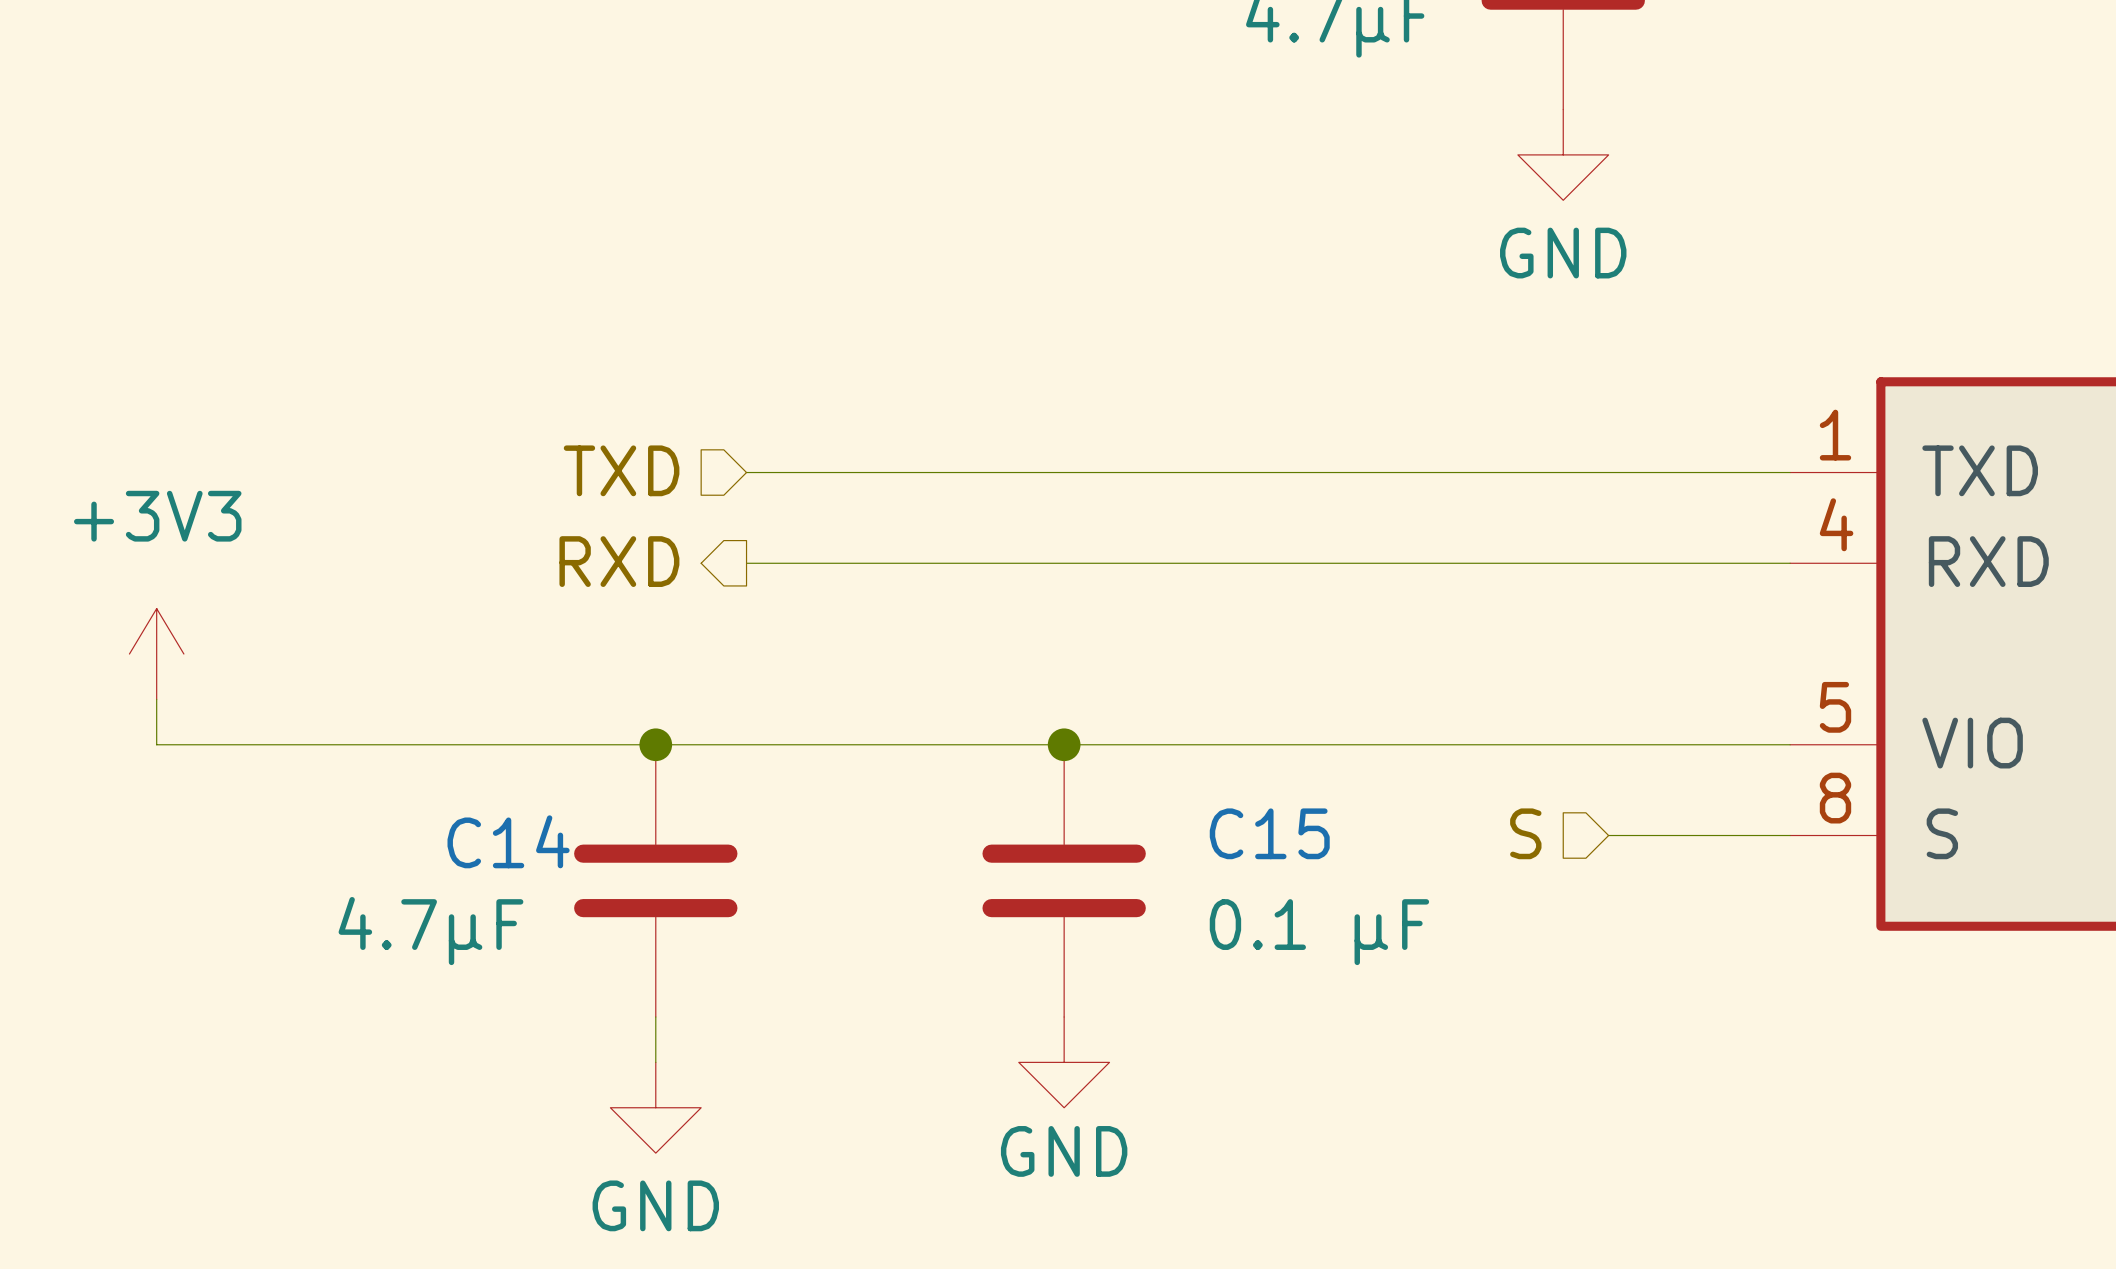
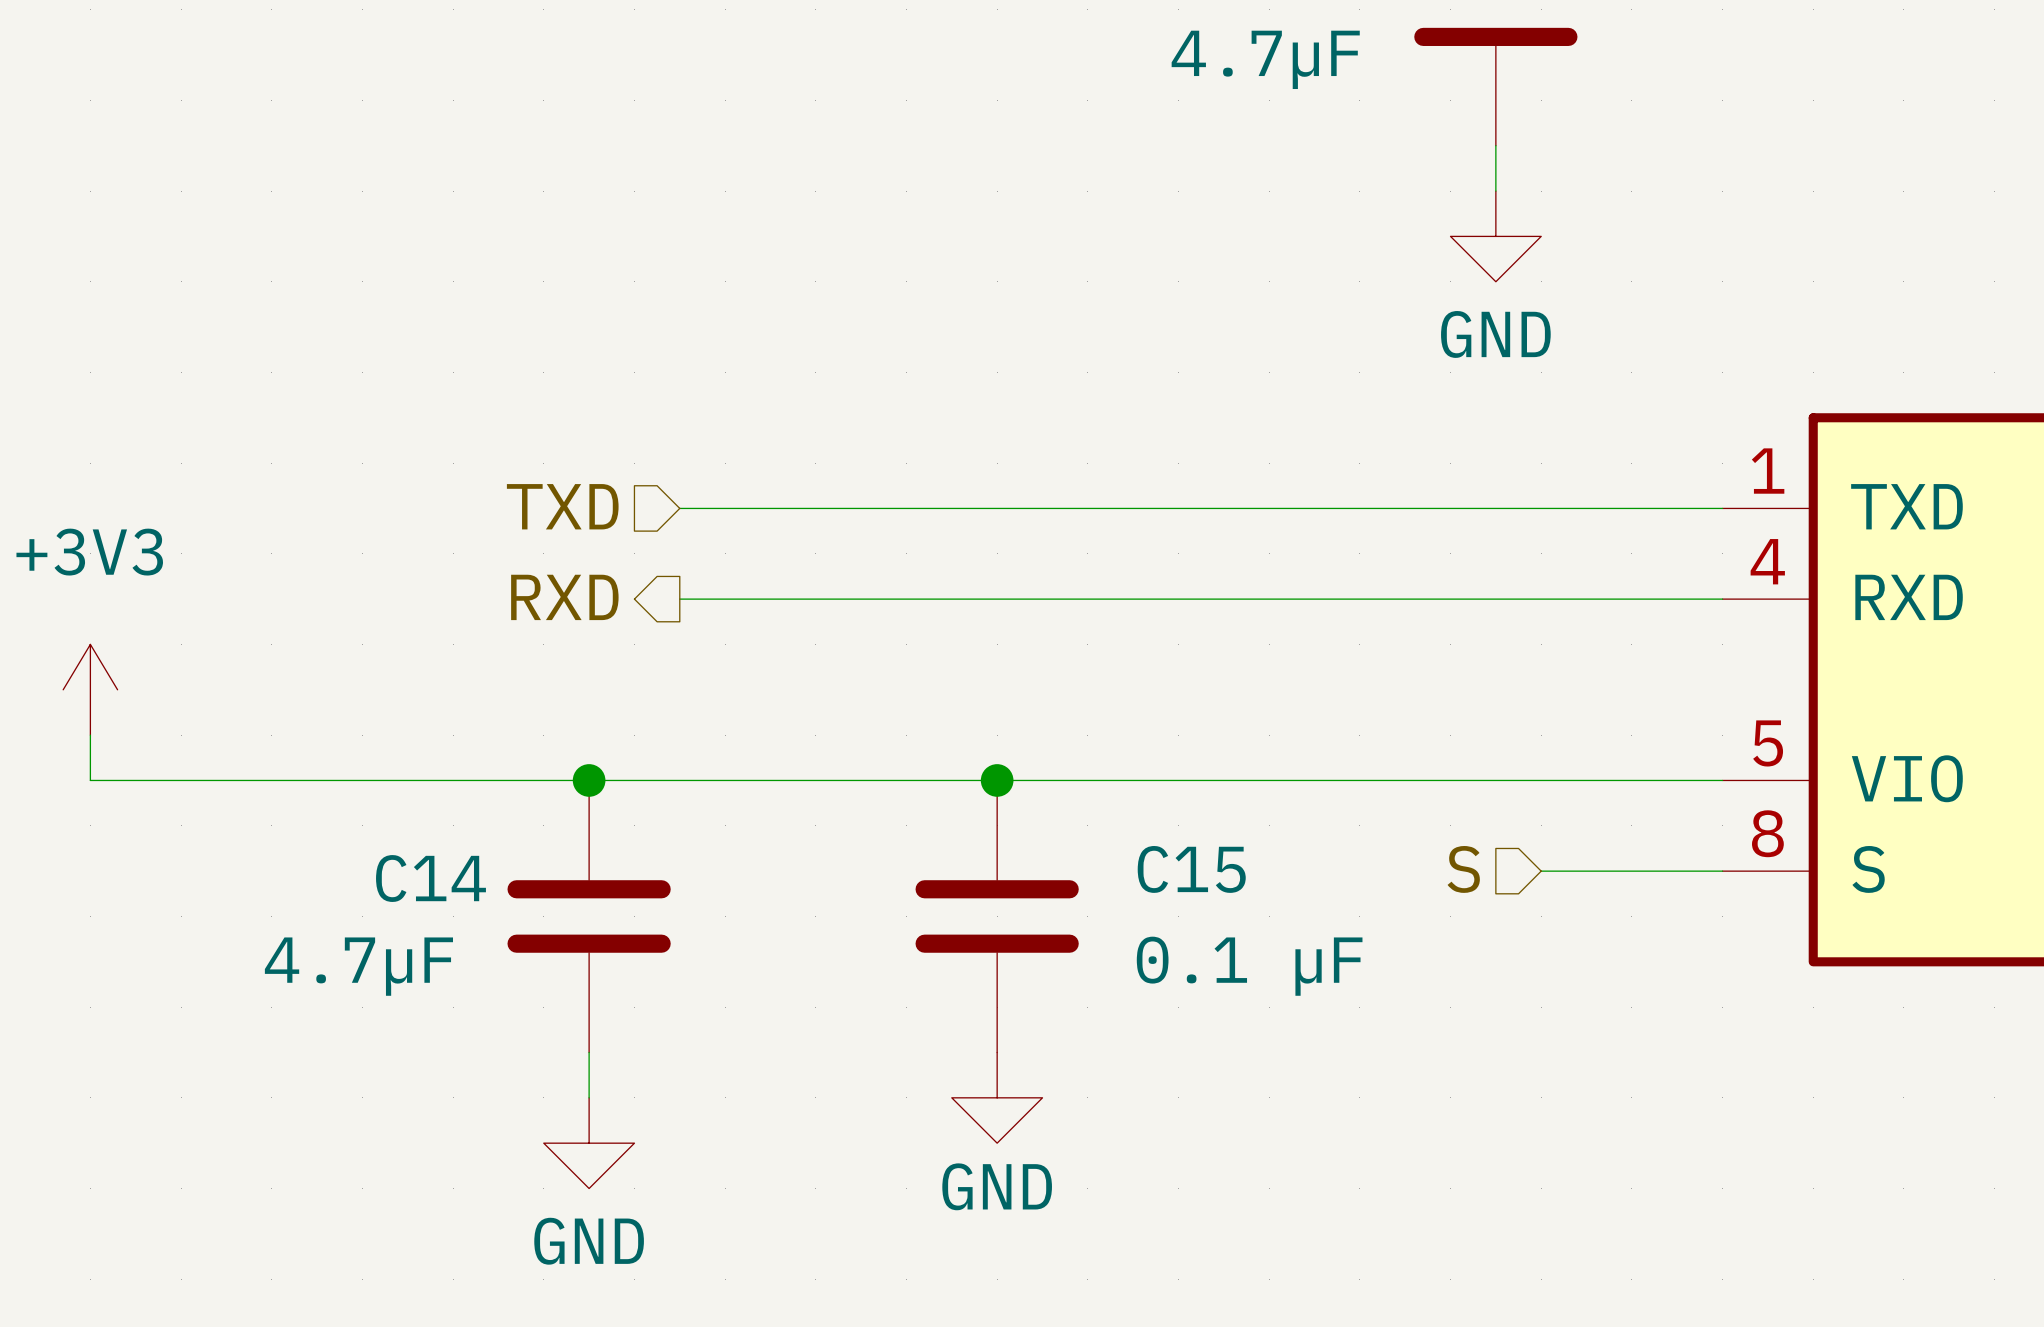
power symbol position: GND (1563, 154) -> GND (1495, 236)

